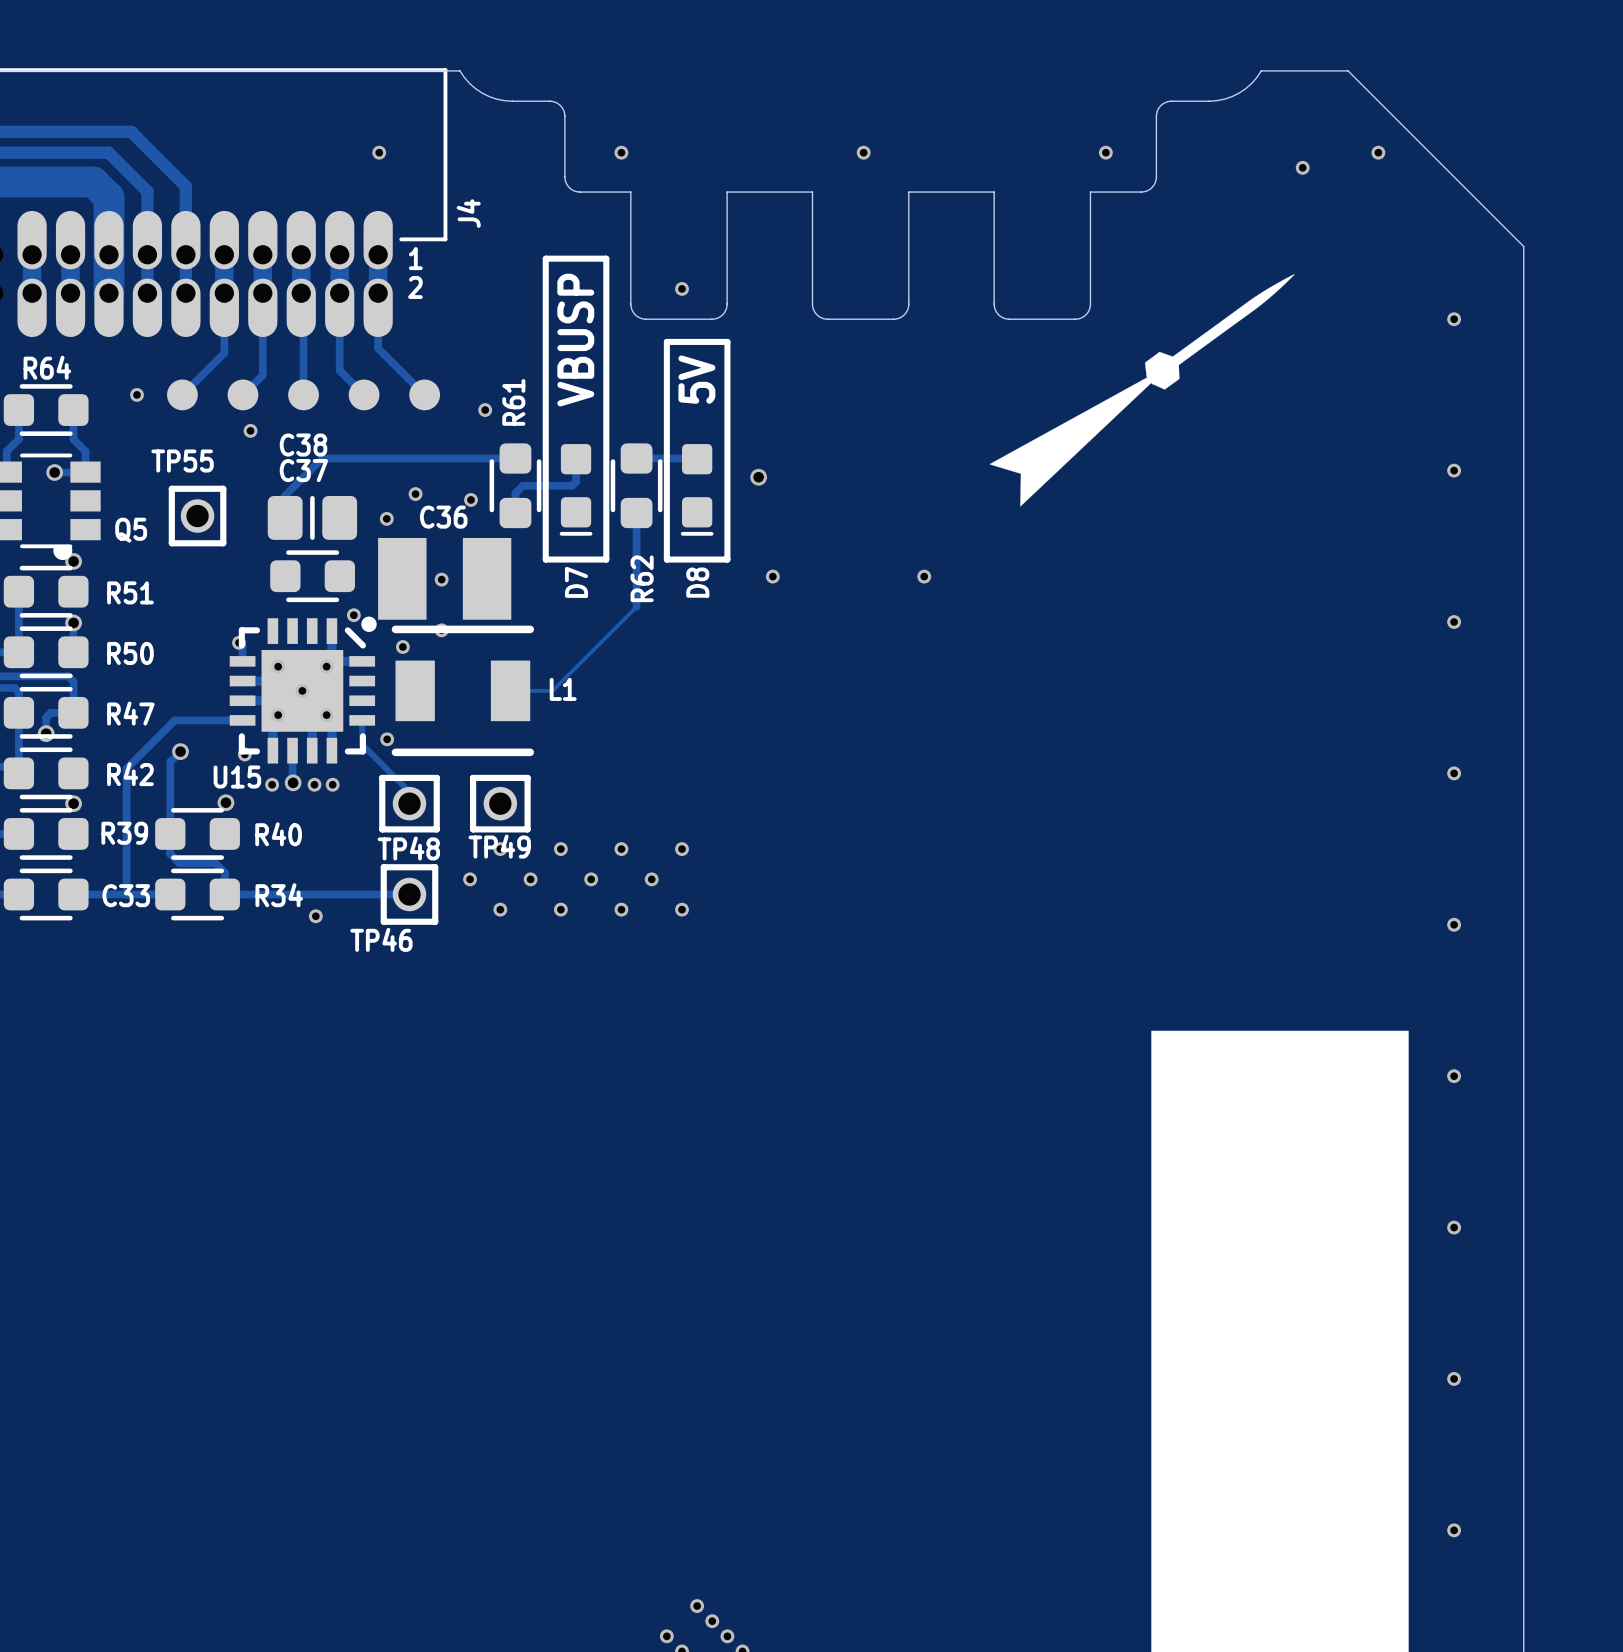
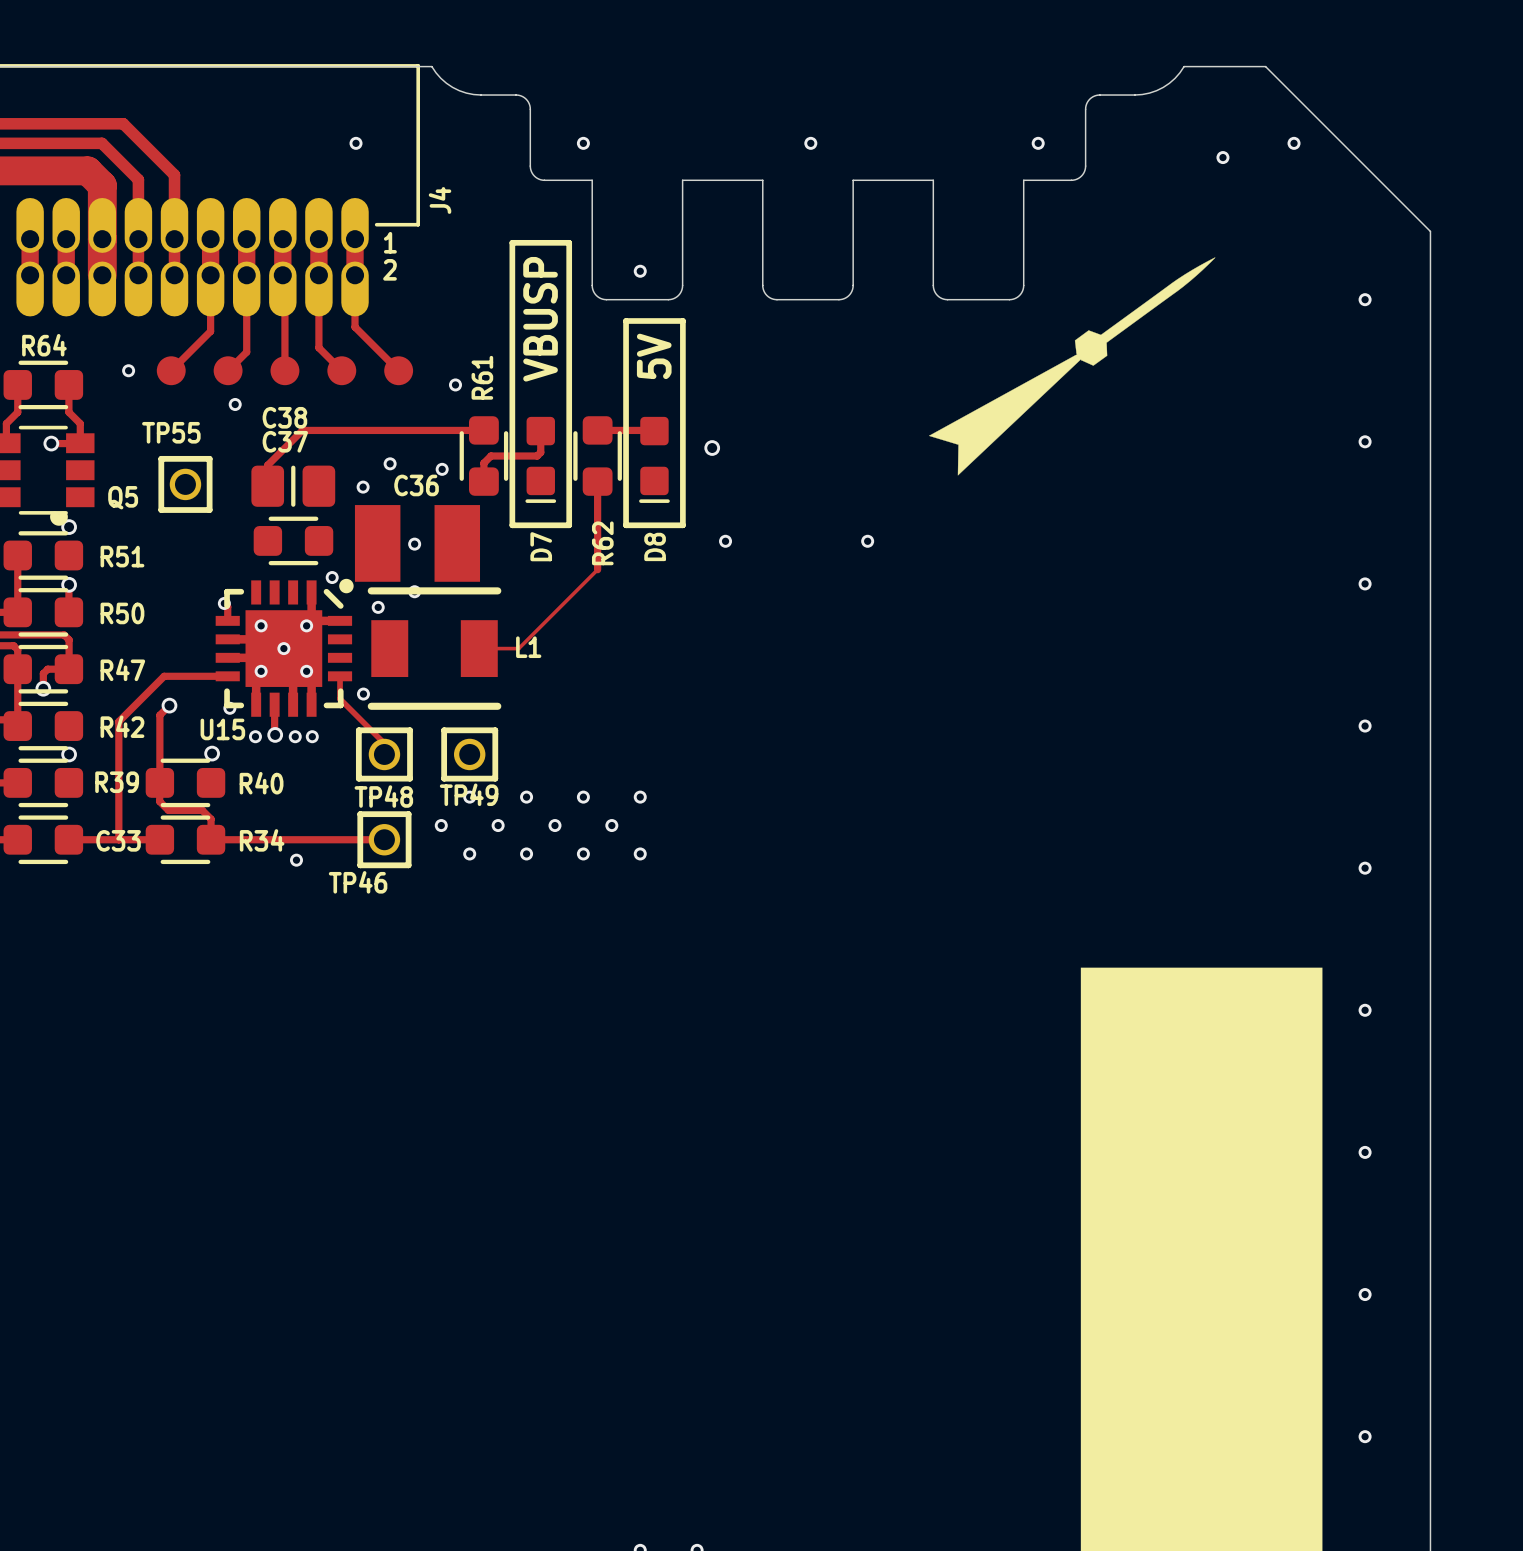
via: (697, 1606) -> none
via: (712, 1621) -> none
via: (666, 1636) -> none
via: (727, 1636) -> none

